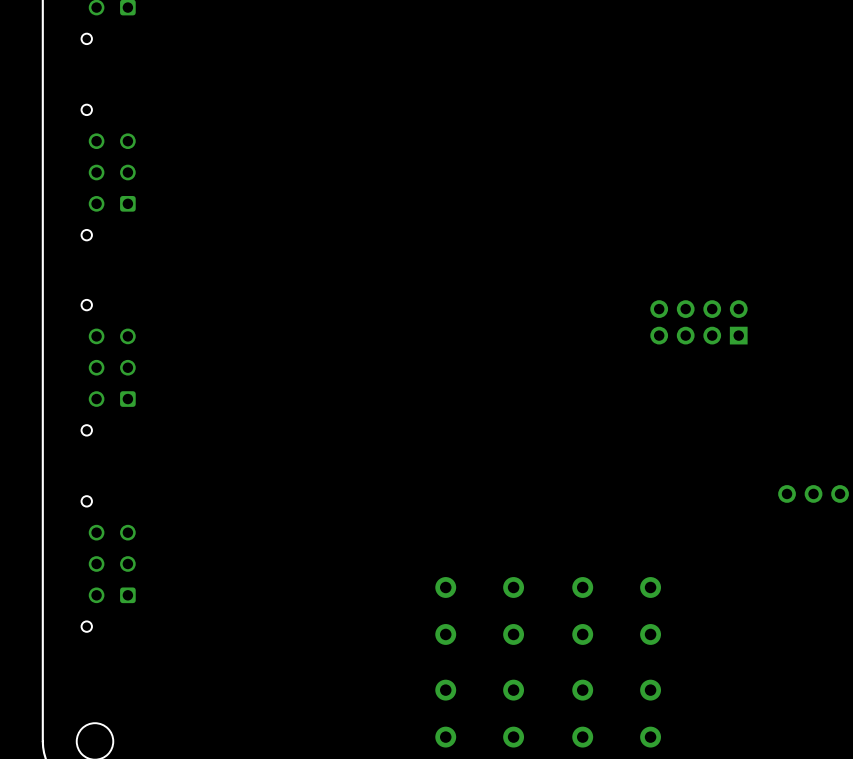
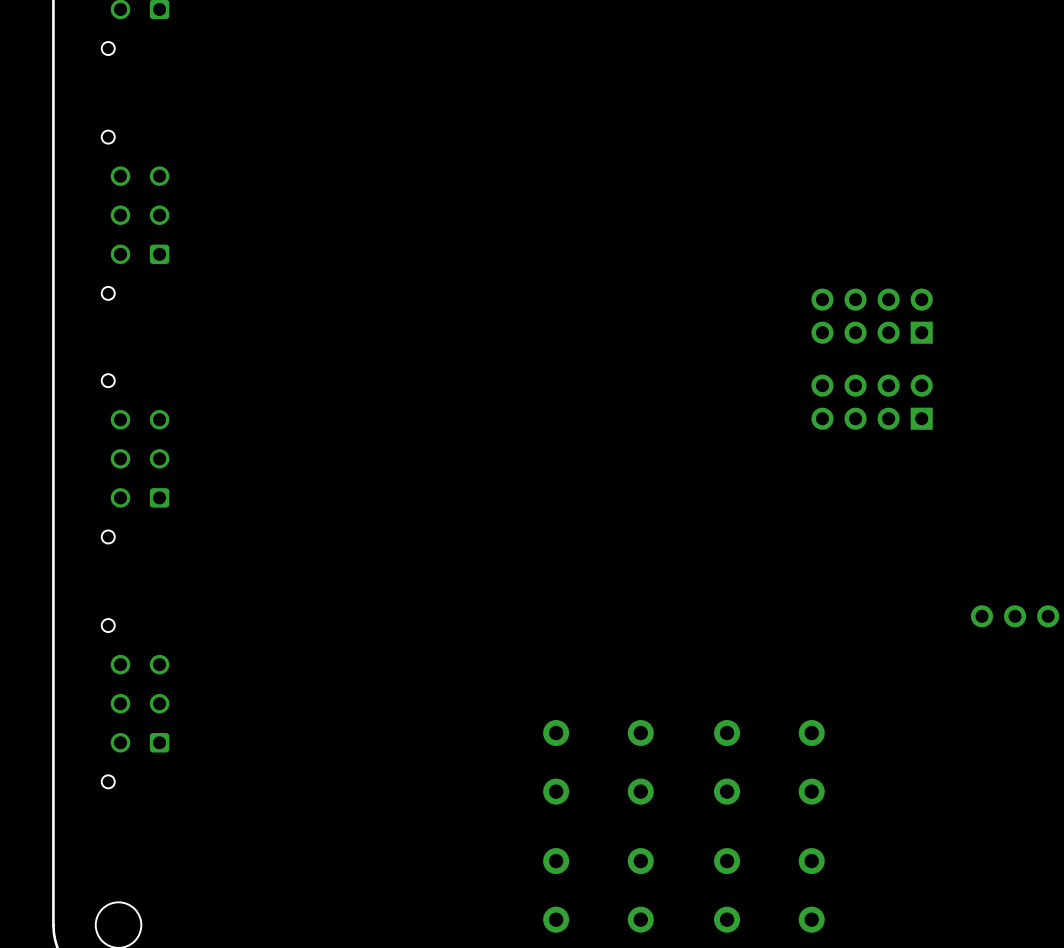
part: none -> (872, 316)

